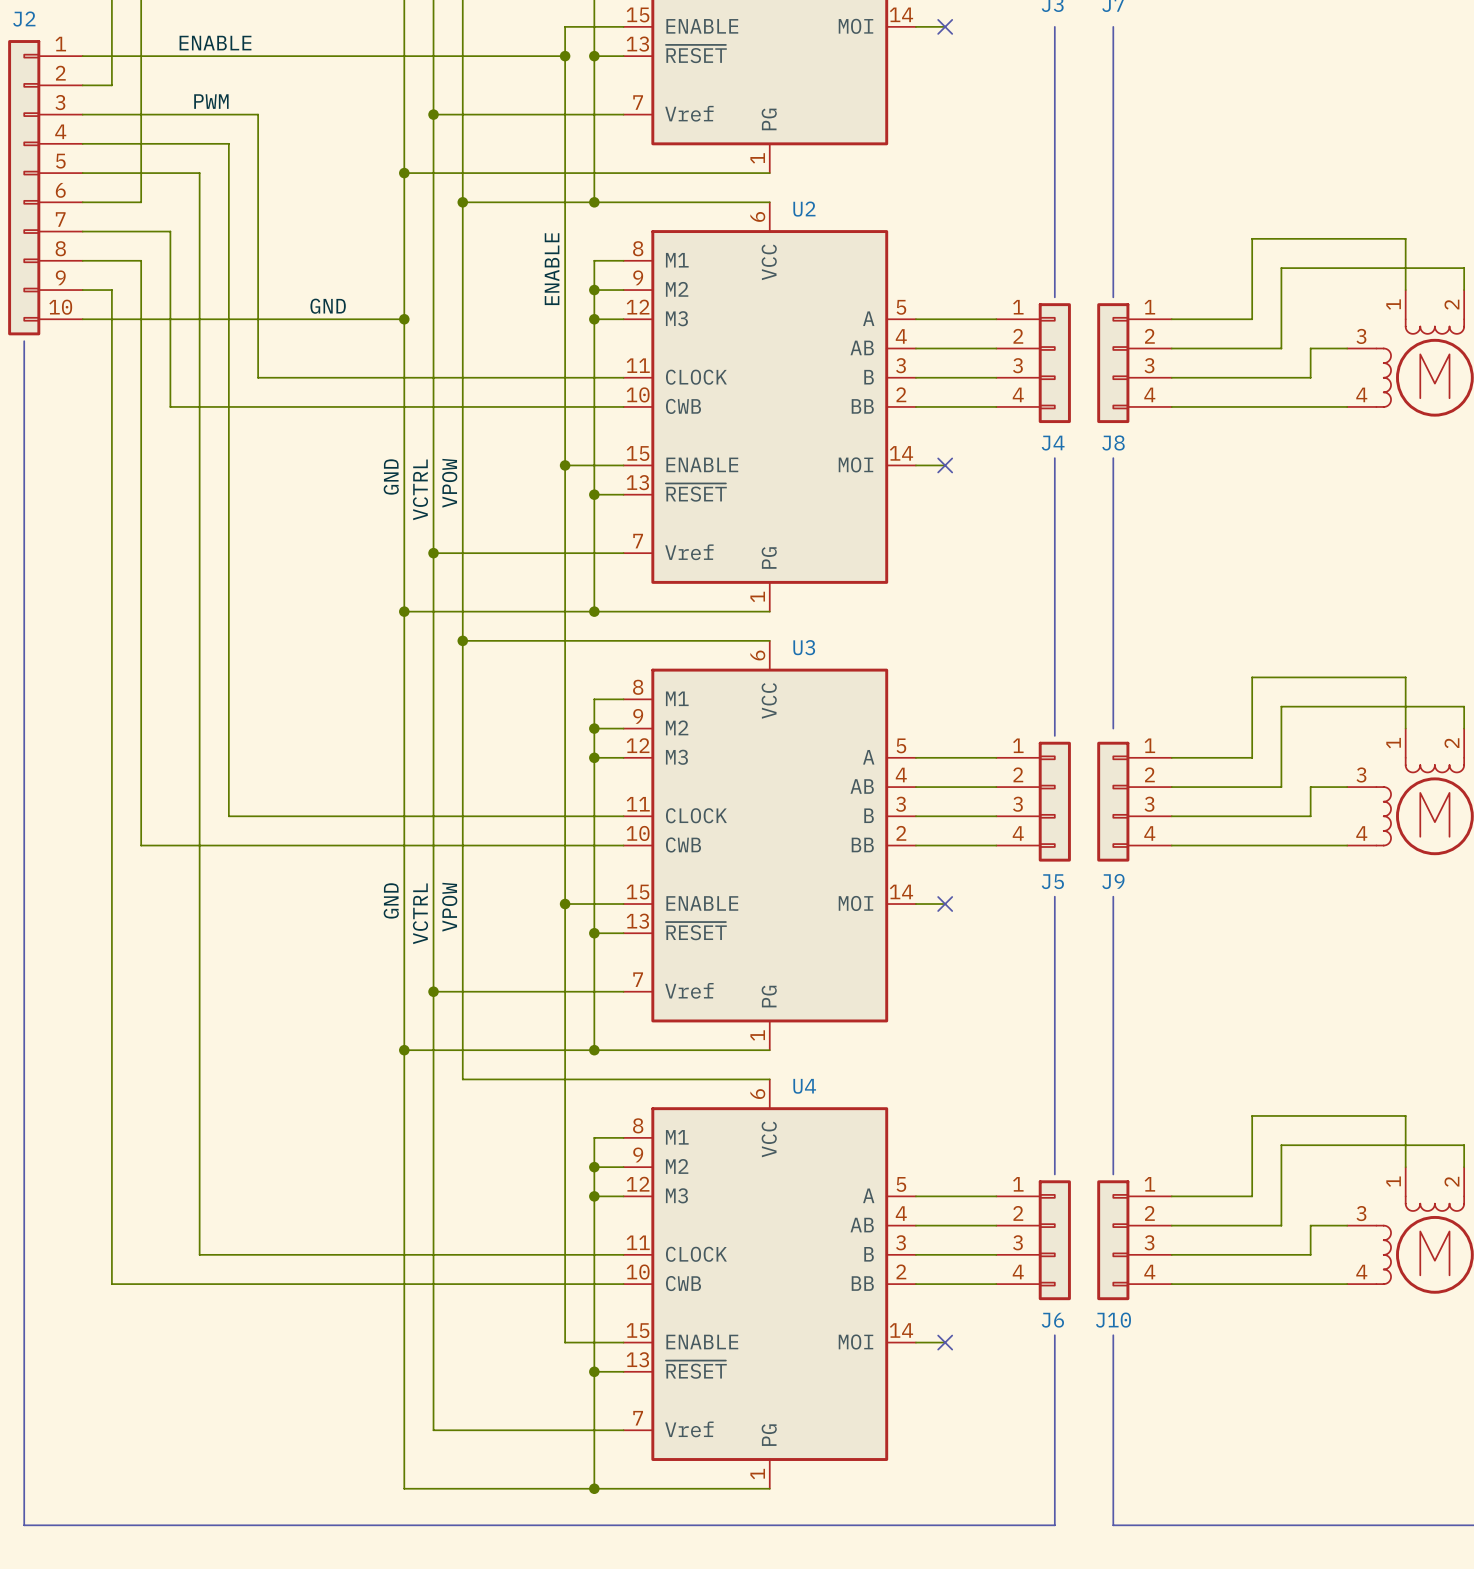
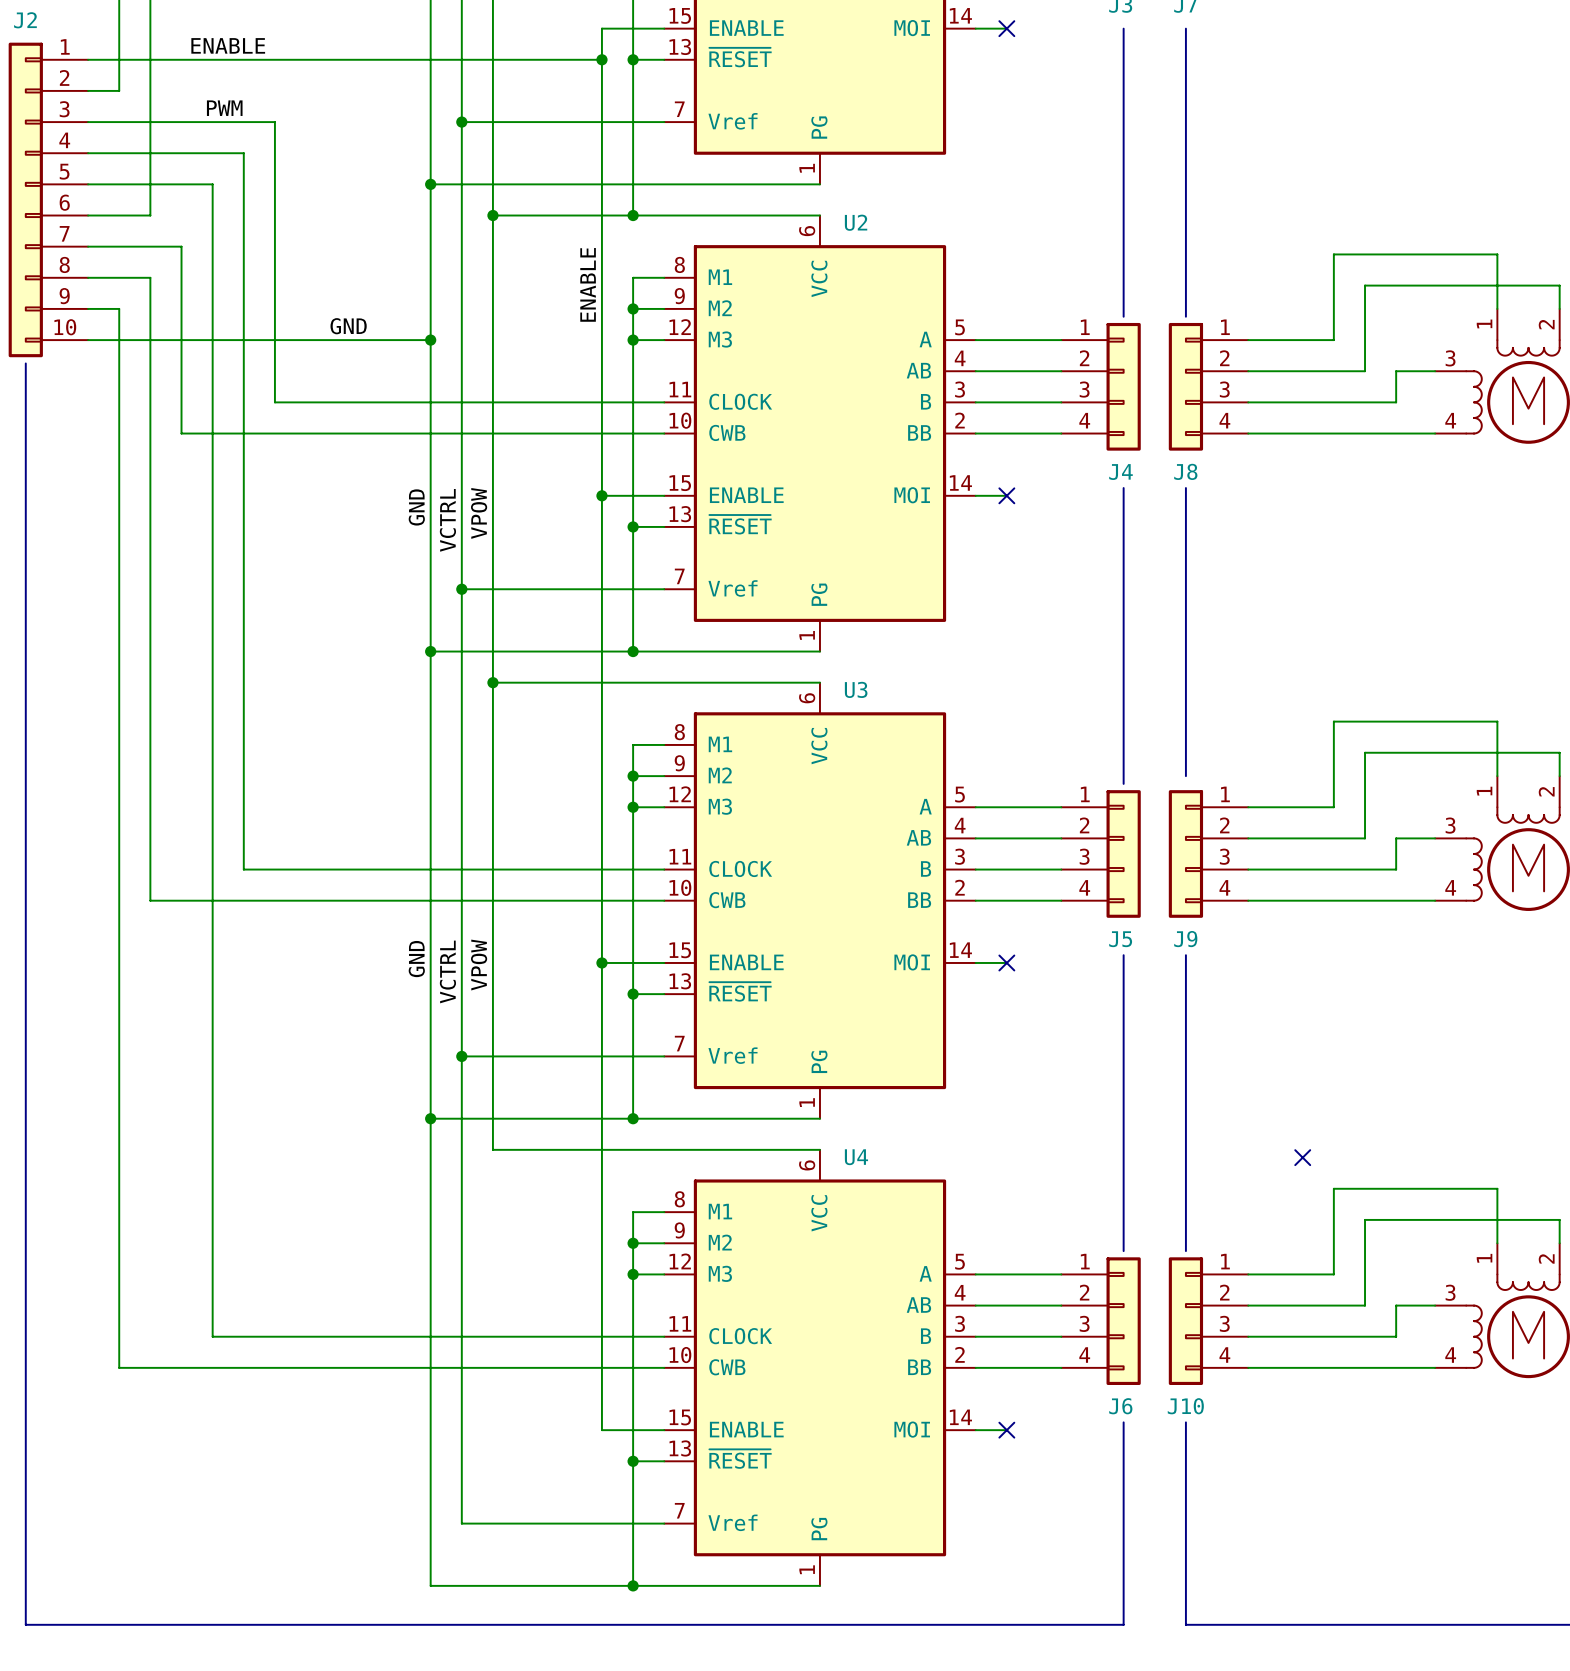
no-connect mark: none -> (1302, 1157)

